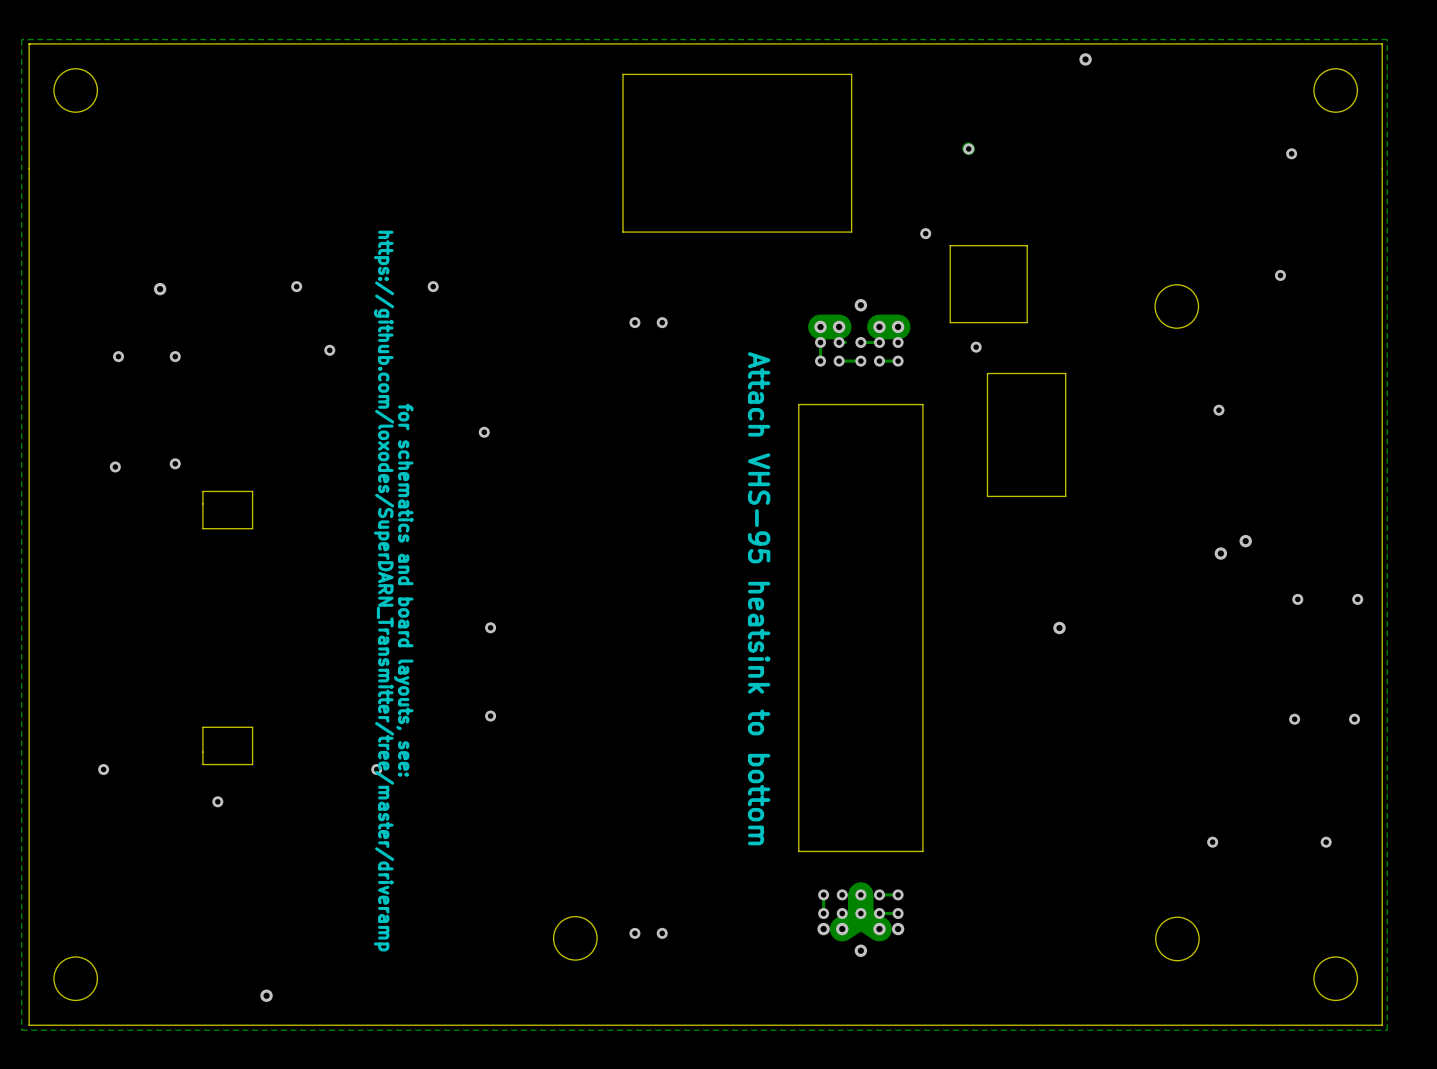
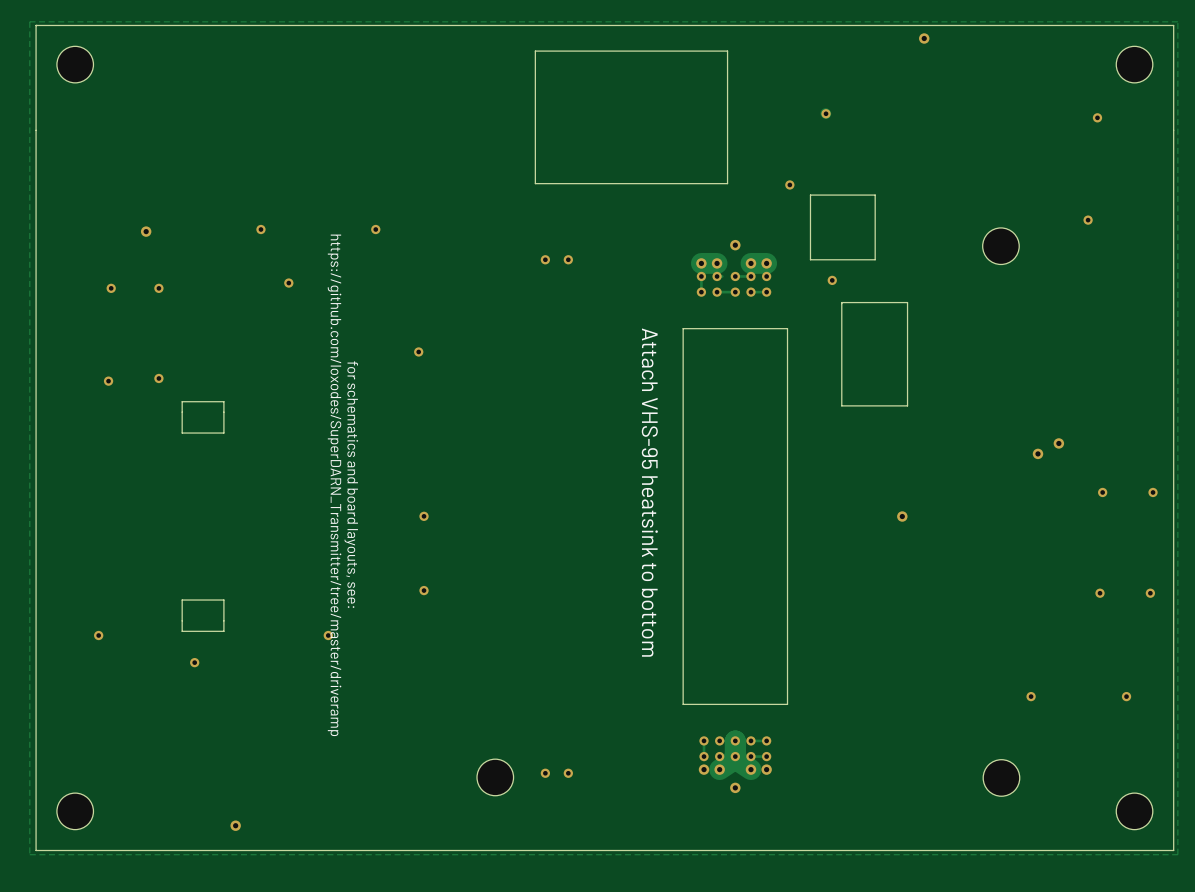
via: (1218, 410) -> none

